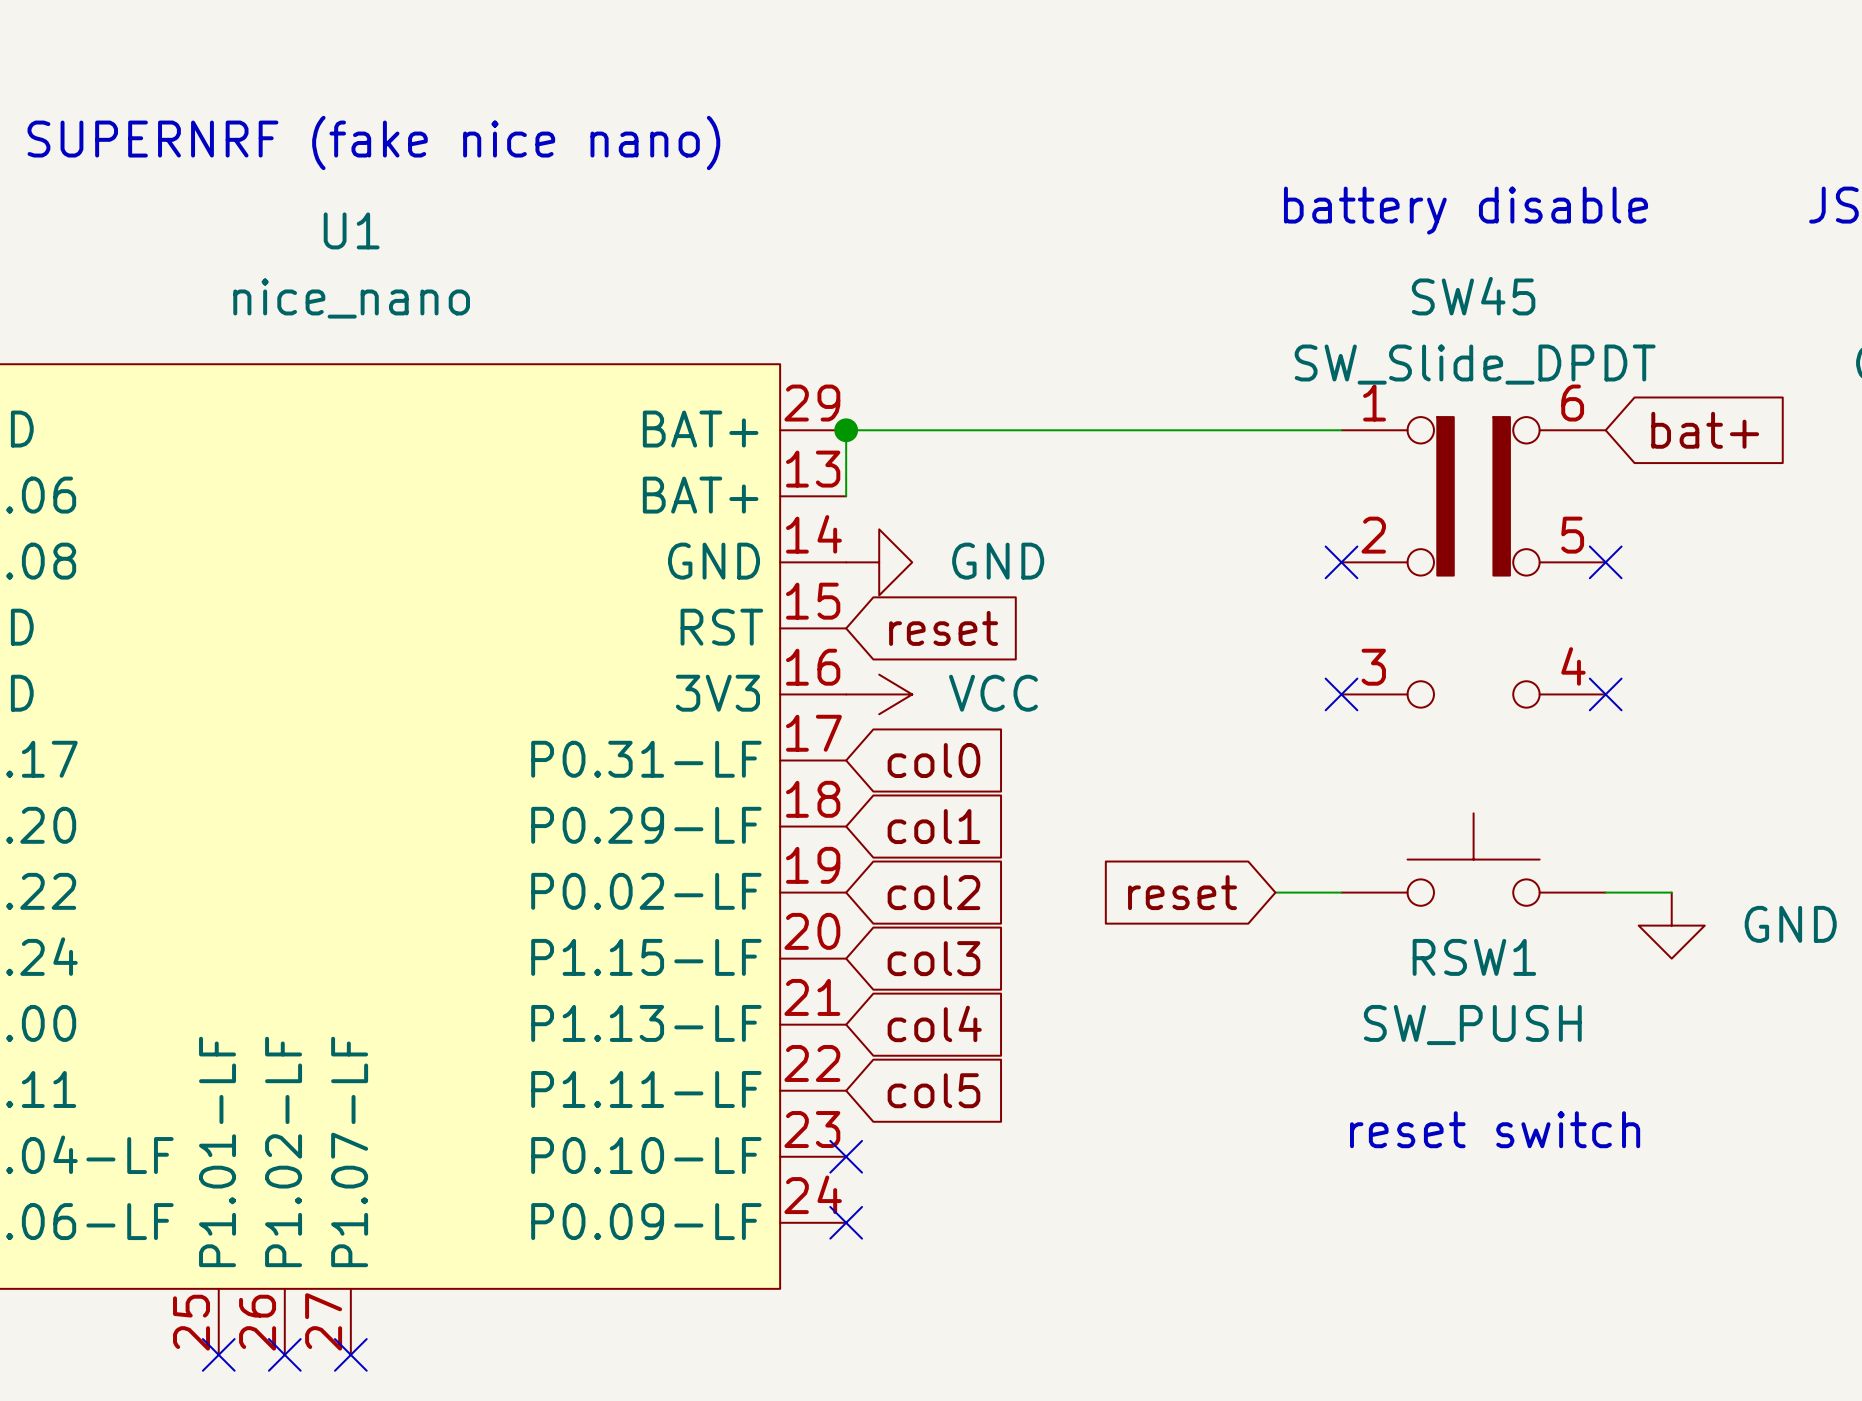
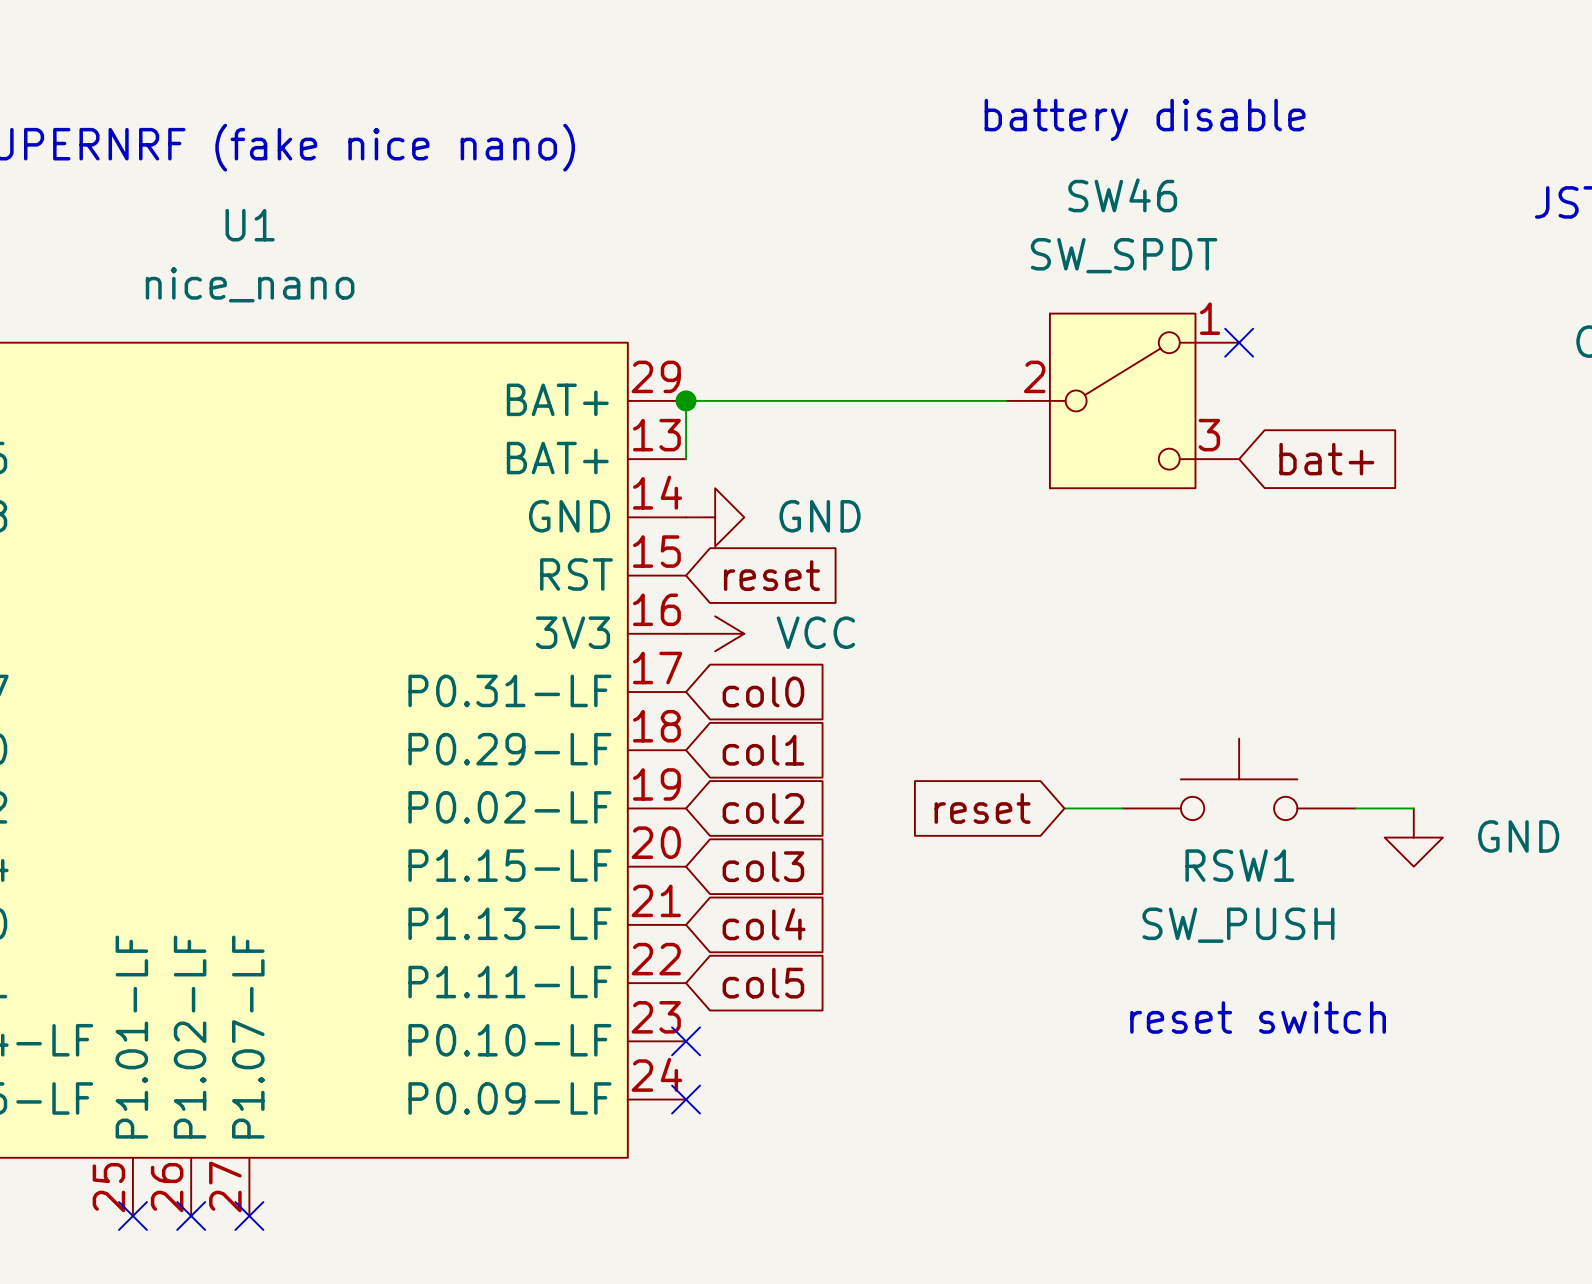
text position: battery disable (1465, 210) -> battery disable (1145, 119)
no-connect mark: none -> (1239, 342)
SW46: none -> SW_SPDT (1122, 400)
global label position: bat+ (1705, 430) -> bat+ (1326, 459)
no-connect mark: (1341, 562) -> none
SW45: SW_Slide_DPDT (1473, 562) -> none
no-connect mark: (1605, 562) -> none
no-connect mark: (1341, 694) -> none
no-connect mark: (1605, 694) -> none

